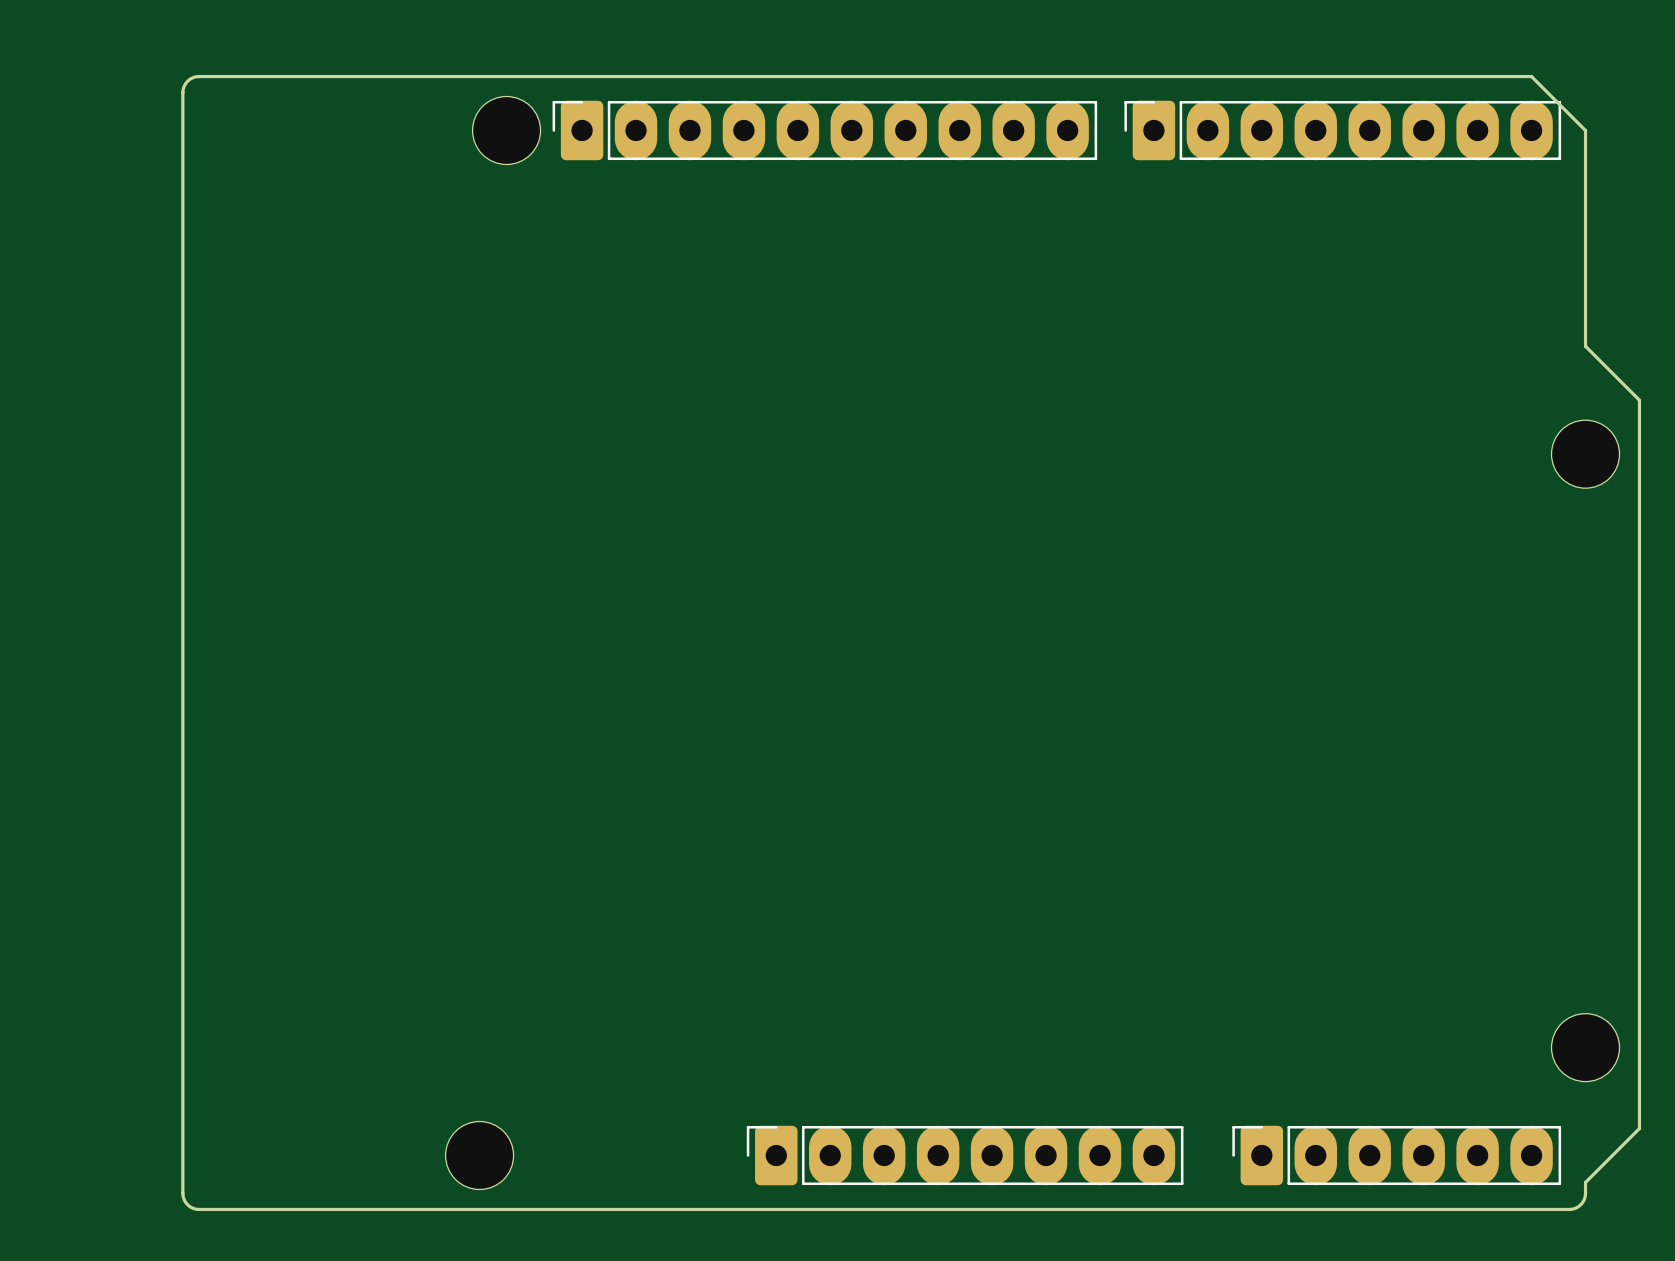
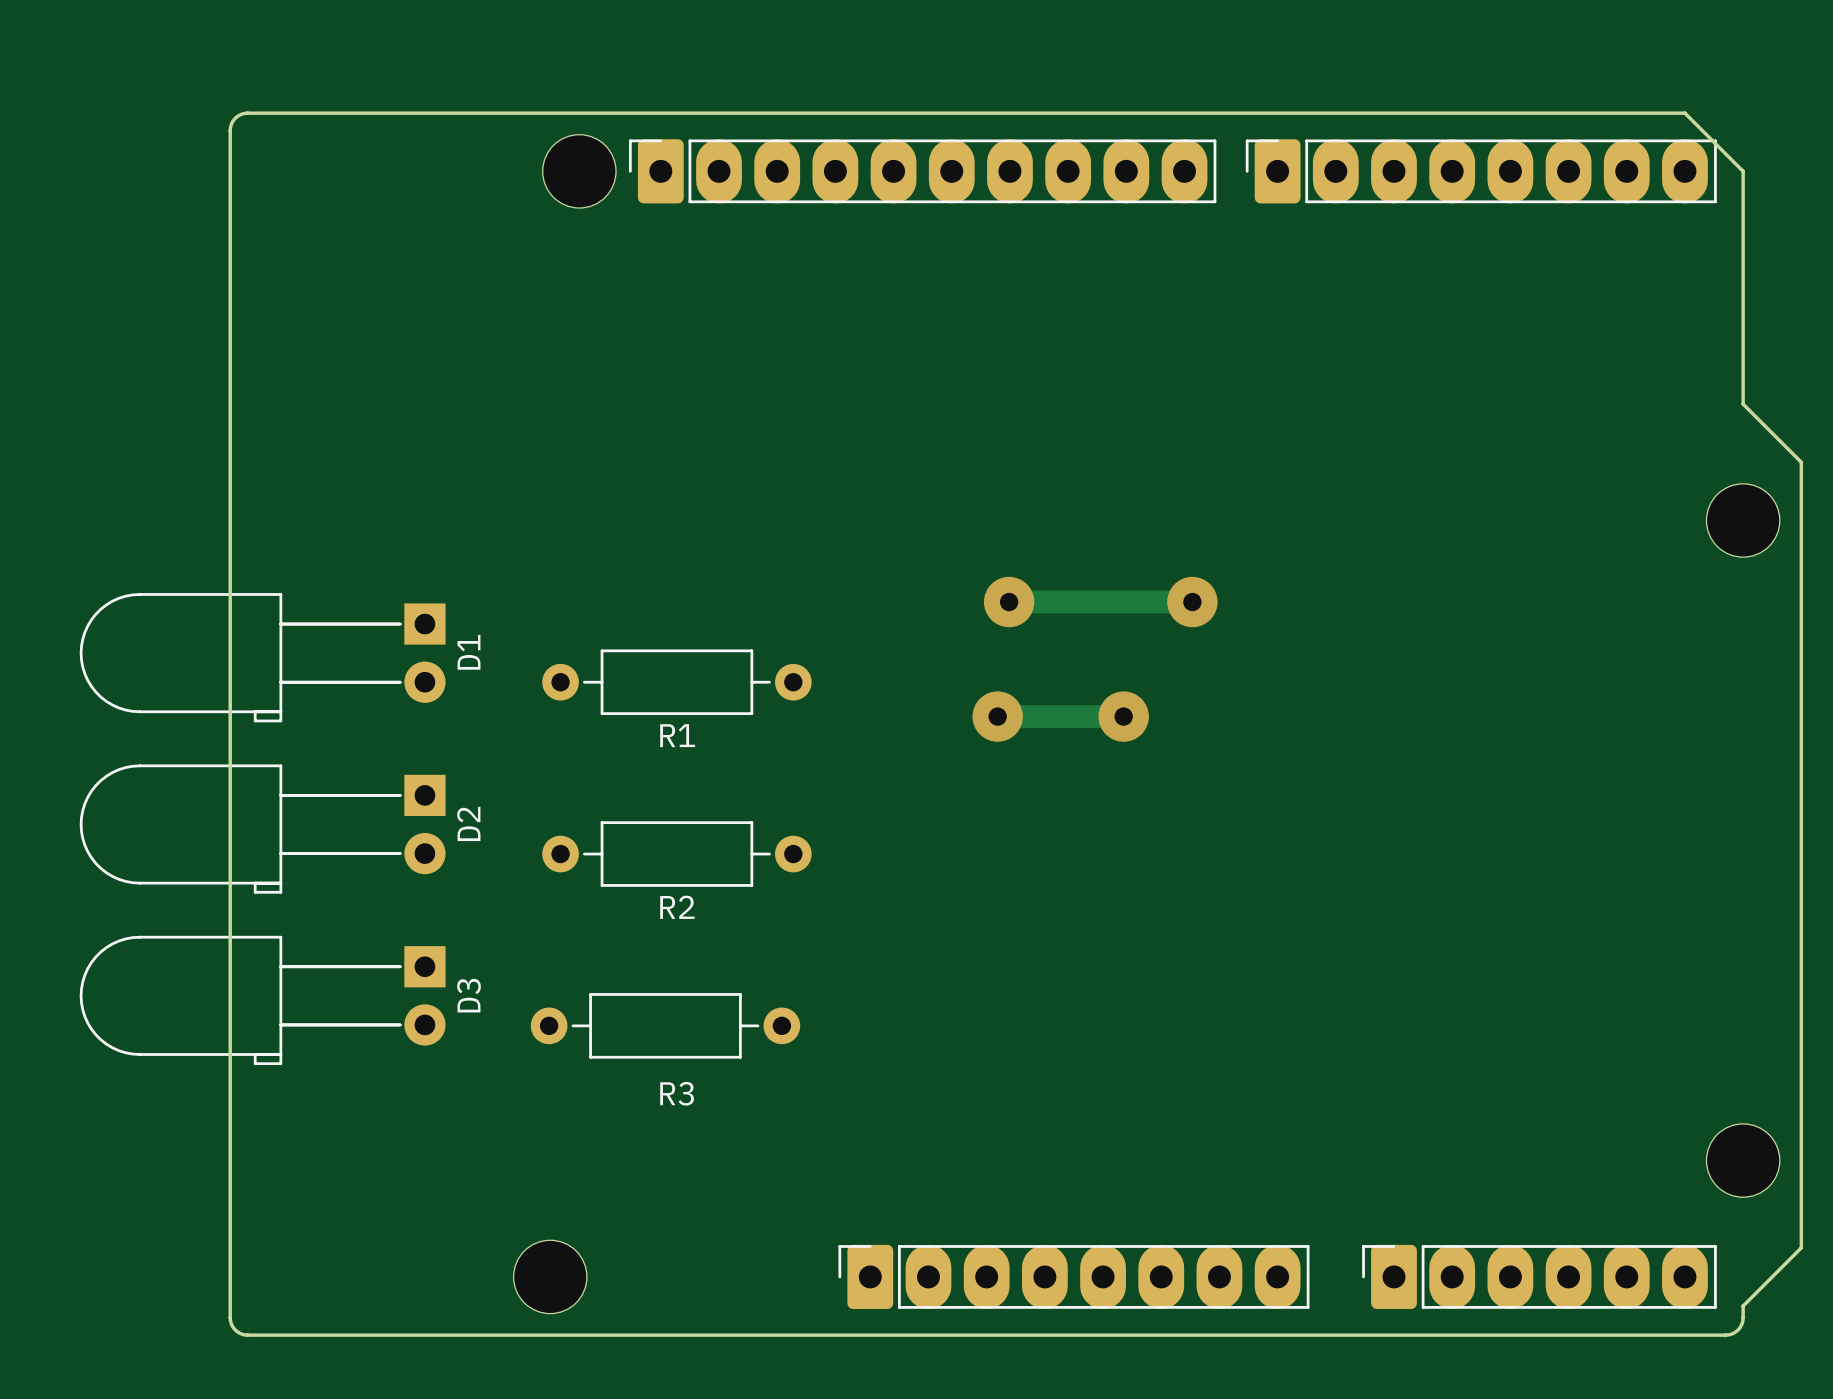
track: none -> (1009, 602) (1192, 602)
via: none -> (1009, 602)
via: none -> (1192, 602)
D1: none -> (262, 657)
R1: none -> (676, 682)
track: none -> (997, 716) (1123, 716)
via: none -> (997, 716)
via: none -> (1123, 716)
D2: none -> (262, 829)
R2: none -> (676, 854)
D3: none -> (262, 1000)
R3: none -> (665, 1025)

